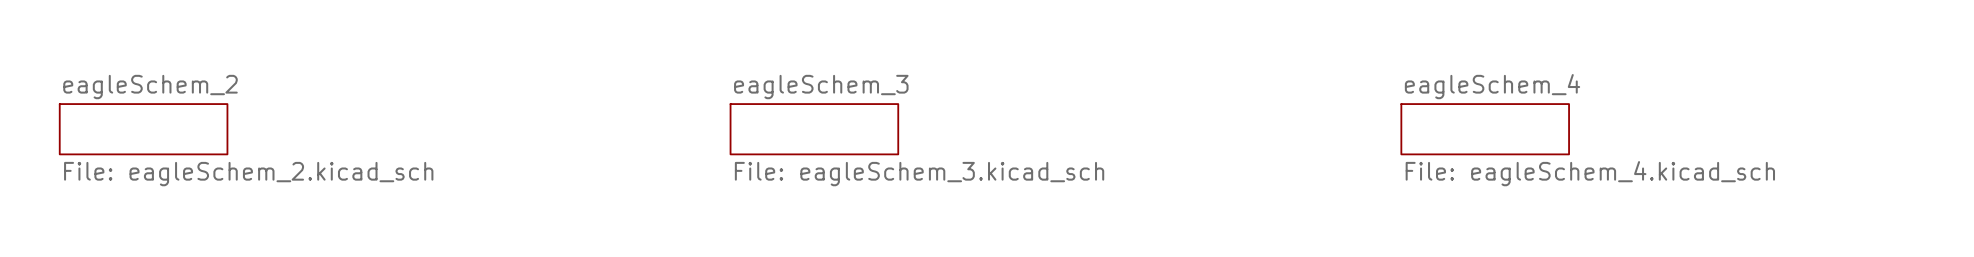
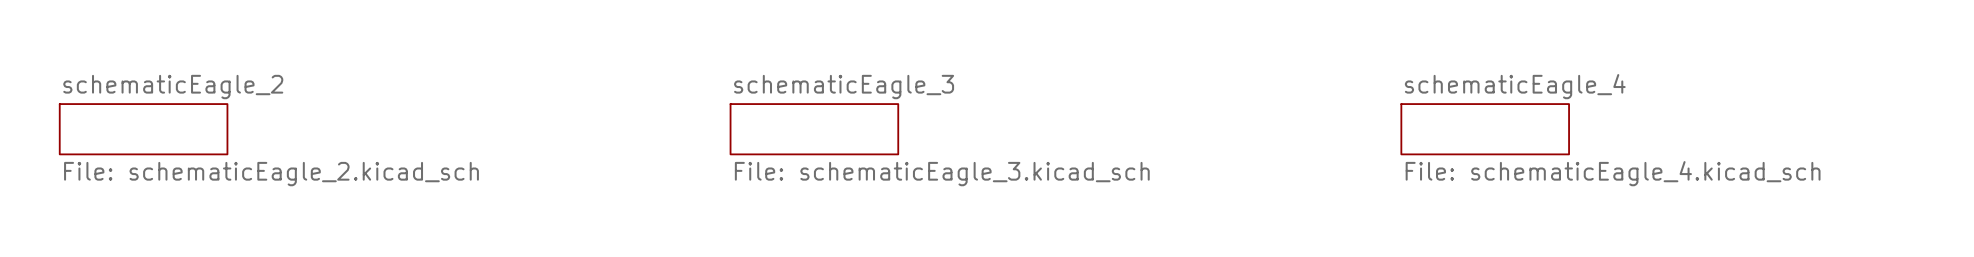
sheet eagleSchem_4 name: eagleSchem_4 (1492, 86) -> schematicEagle_4 (1515, 86)
sheet eagleSchem_2 name: eagleSchem_2 (150, 87) -> schematicEagle_2 (173, 87)
sheet eagleSchem_3 name: eagleSchem_3 (821, 87) -> schematicEagle_3 (844, 87)
sheet eagleSchem_4 value: File: eagleSchem_4.kicad_sch (1590, 173) -> File: schematicEagle_4.kicad_sch (1613, 173)
sheet eagleSchem_2 value: File: eagleSchem_2.kicad_sch (248, 174) -> File: schematicEagle_2.kicad_sch (271, 174)
sheet eagleSchem_3 value: File: eagleSchem_3.kicad_sch (919, 174) -> File: schematicEagle_3.kicad_sch (942, 174)

